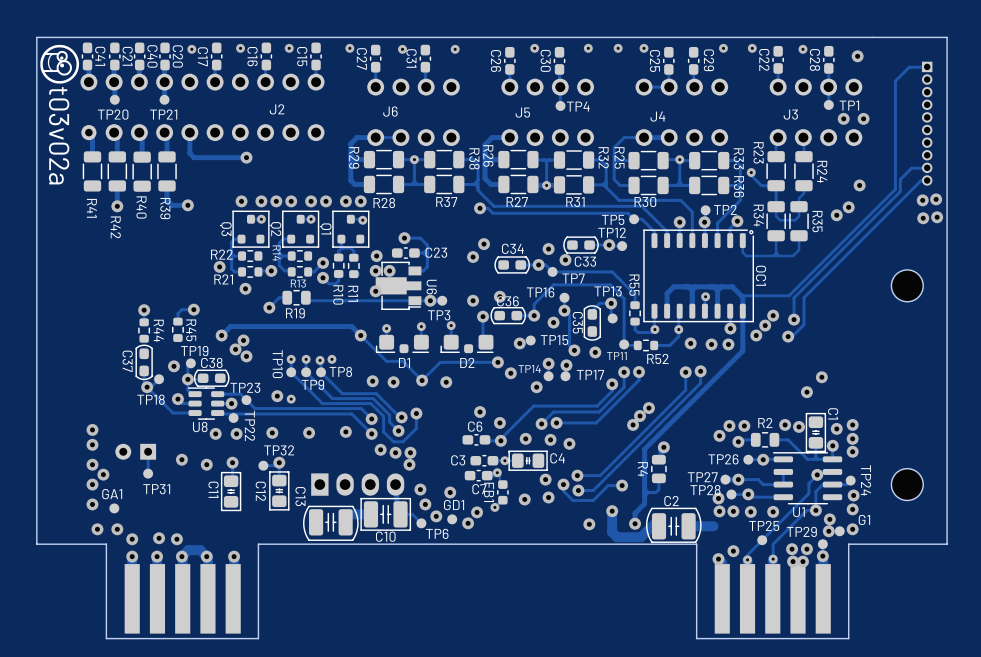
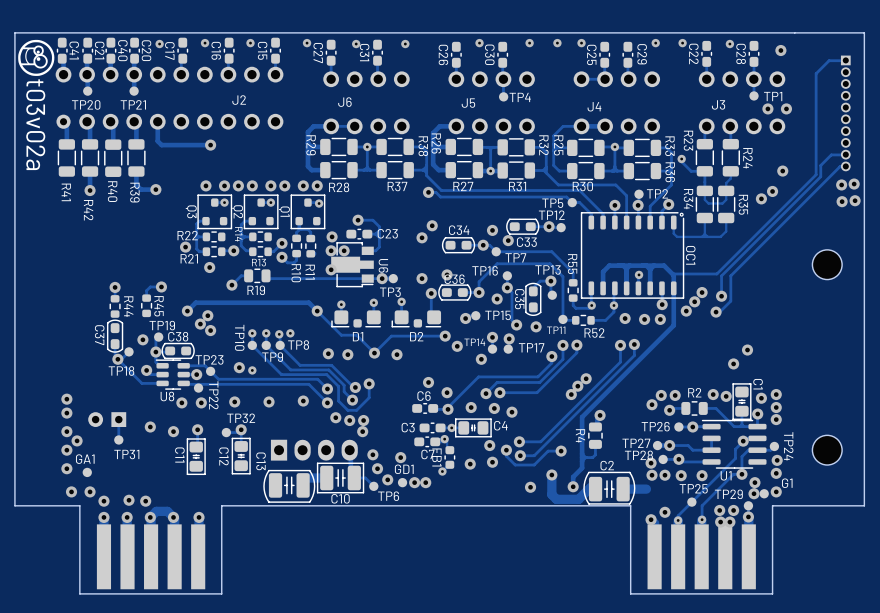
via: (477, 512) -> none
via: none -> (414, 482)
via: none -> (425, 482)
via: (468, 523) -> none

